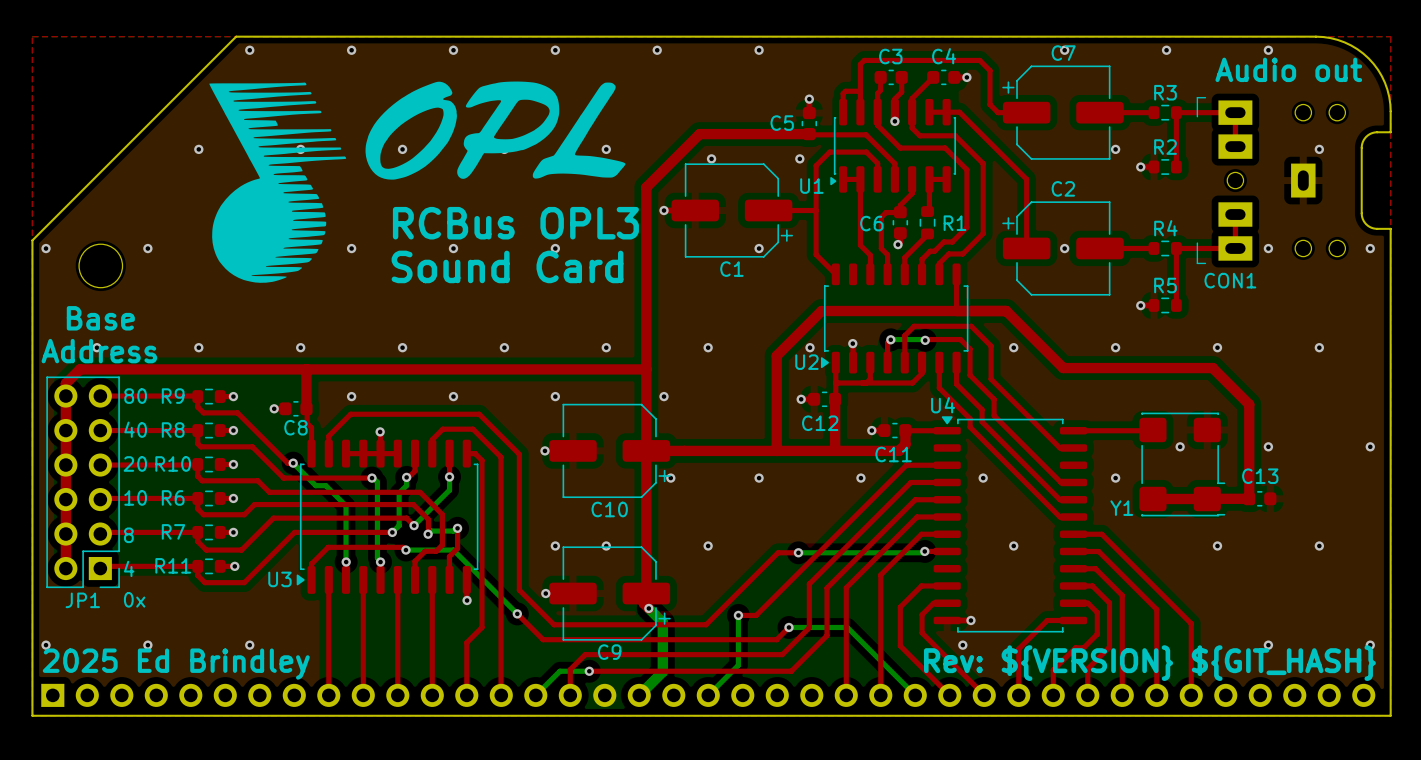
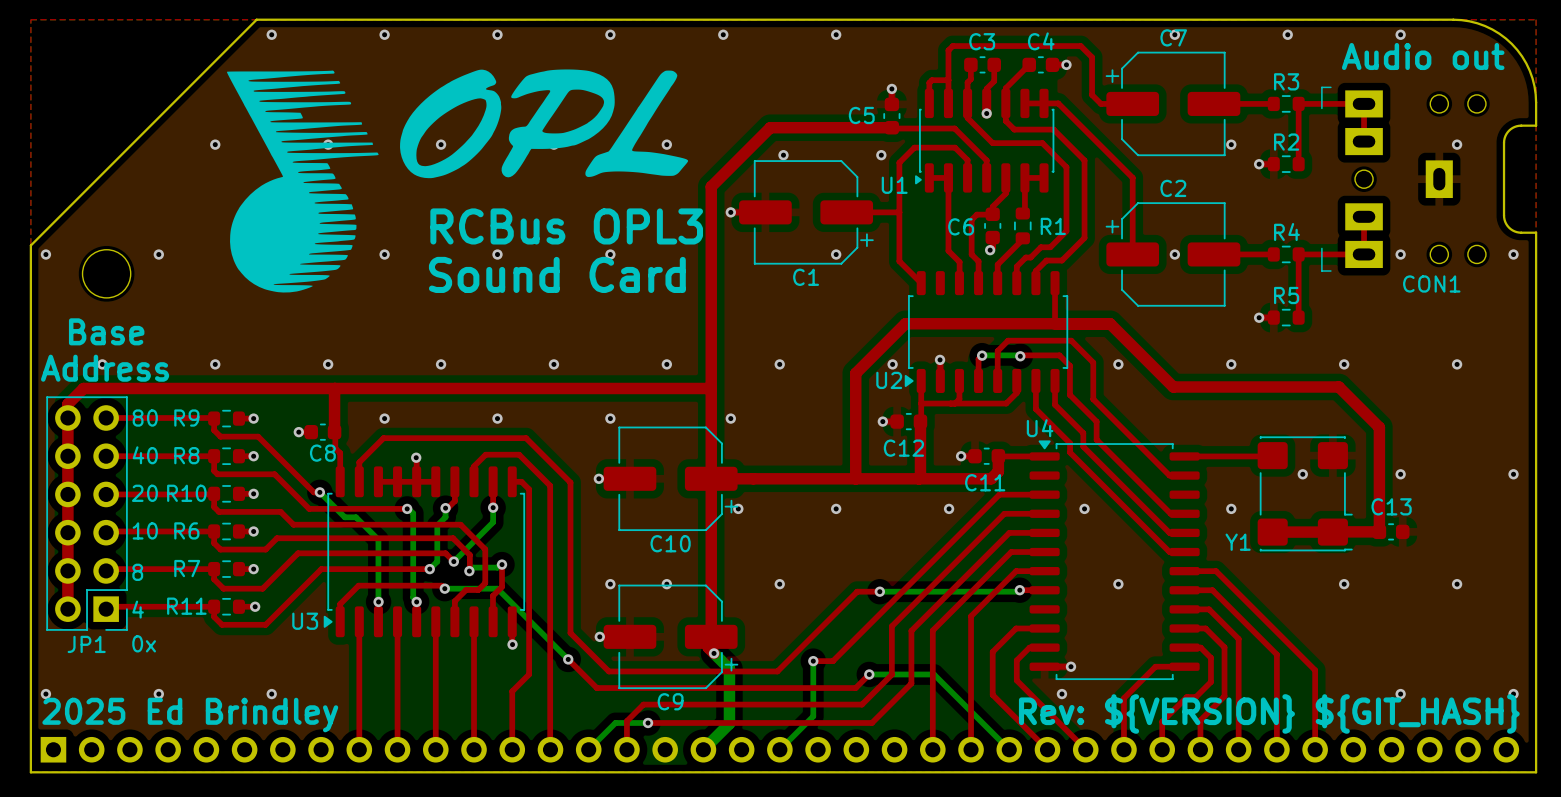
CON1 name position: CON1 (1230, 280) -> CON1 (1431, 283)

